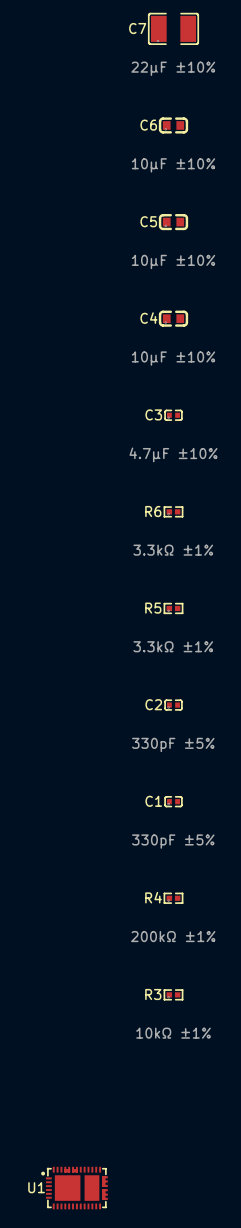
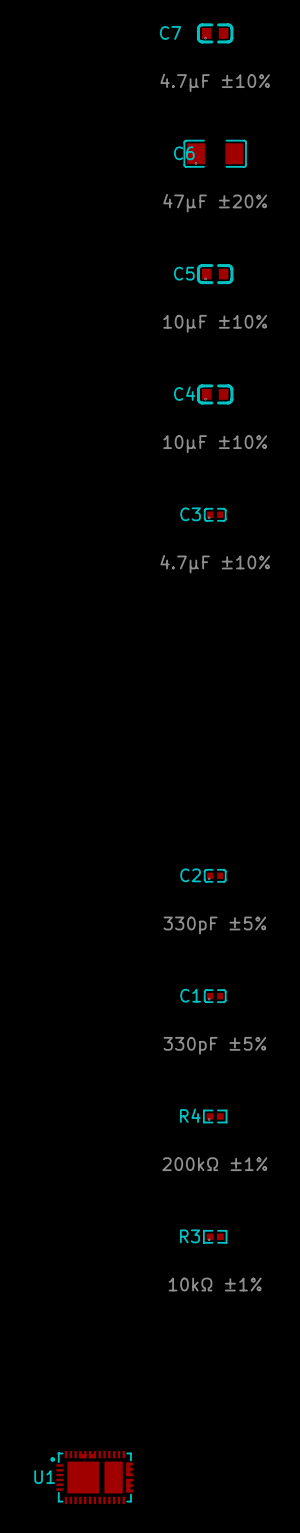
C7 footprint: [148, 12, 199, 45] -> [196, 23, 234, 44]
C7 value: 22µF ±10% (173, 68) -> 4.7µF ±10% (215, 82)
C6 footprint: [158, 117, 189, 134] -> [183, 139, 247, 168]
C6 value: 10µF ±10% (173, 165) -> 47µF ±20% (215, 203)
R6: 3.3kΩ ±1% (173, 511) -> none
R5: 3.3kΩ ±1% (173, 608) -> none

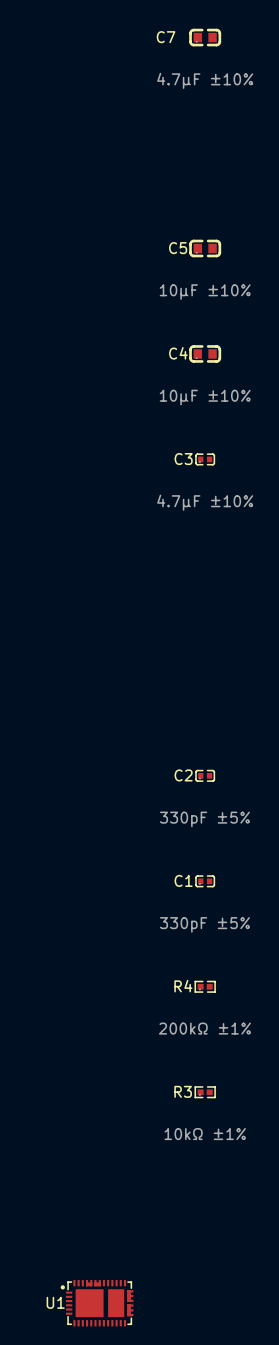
C6: 47µF ±20% (215, 153) -> none

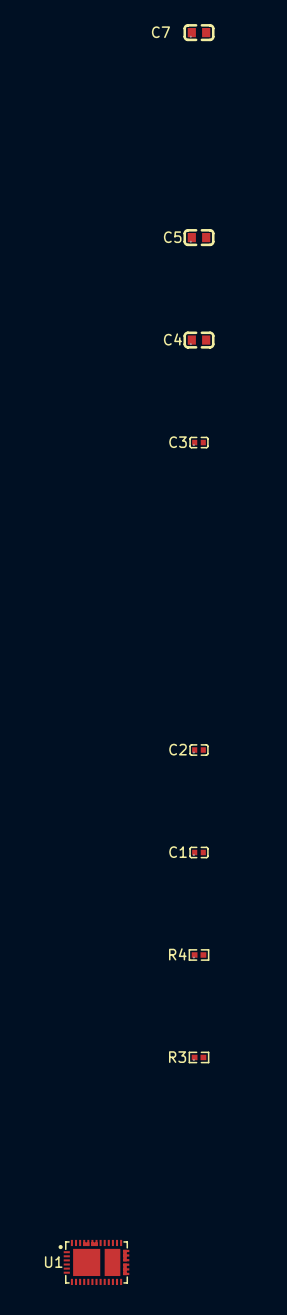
C7 value: 4.7µF ±10% (205, 80) -> none
C5 value: 10µF ±10% (205, 292) -> none
C4 value: 10µF ±10% (205, 397) -> none
C3 value: 4.7µF ±10% (205, 502) -> none
C2 value: 330pF ±5% (204, 819) -> none
C1 value: 330pF ±5% (204, 924) -> none
R4 value: 200kΩ ±1% (204, 1028) -> none
R3 value: 10kΩ ±1% (205, 1134) -> none

